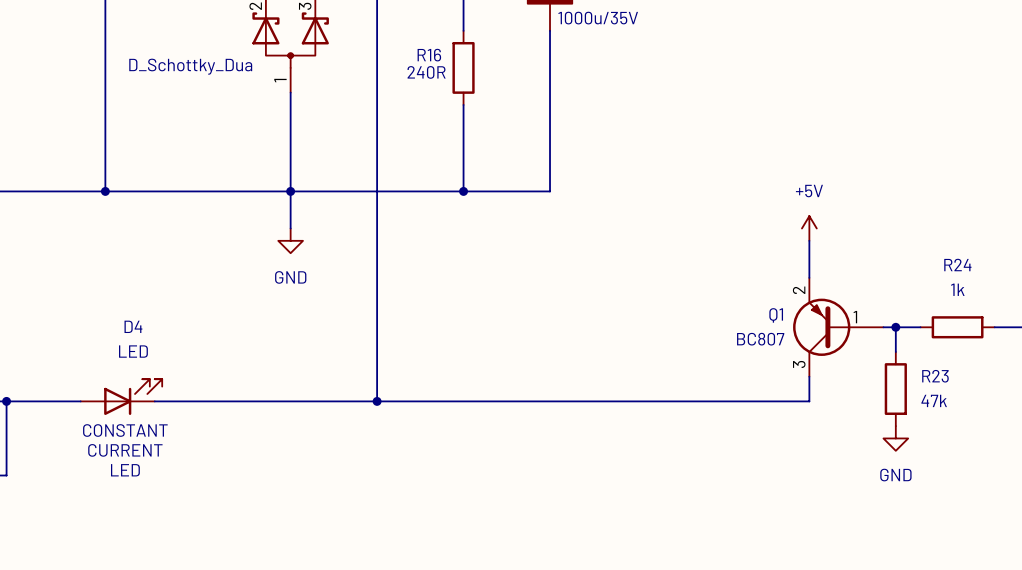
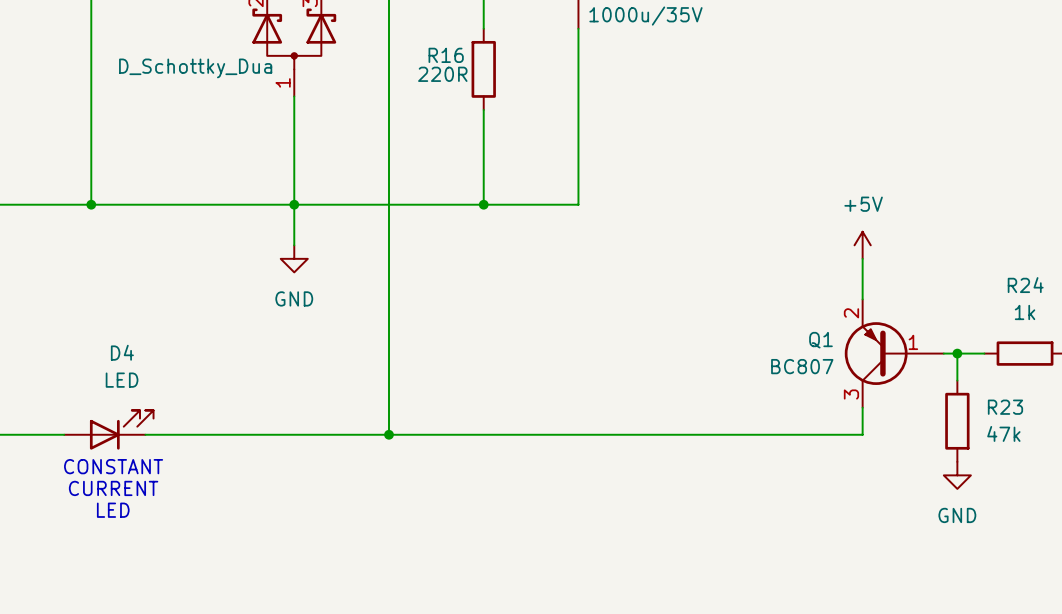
R16 value: 240R (426, 72) -> 220R (442, 74)

